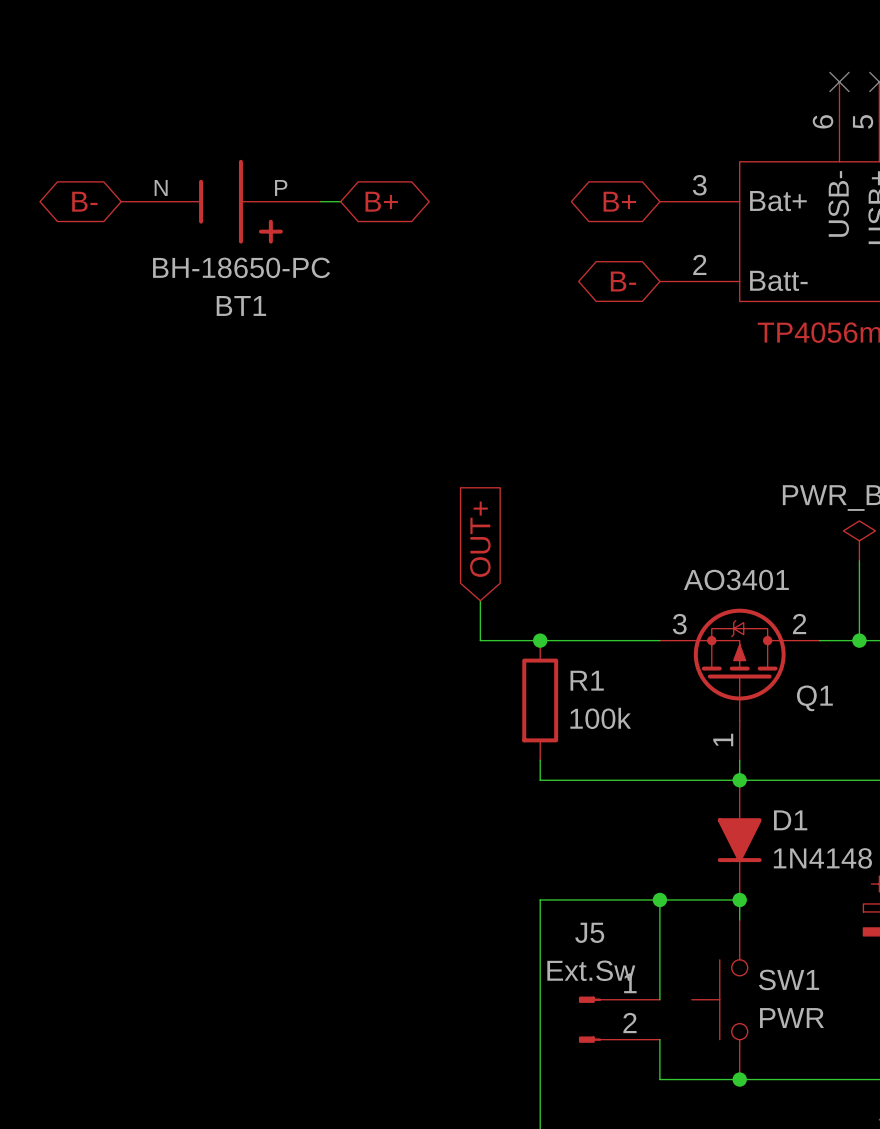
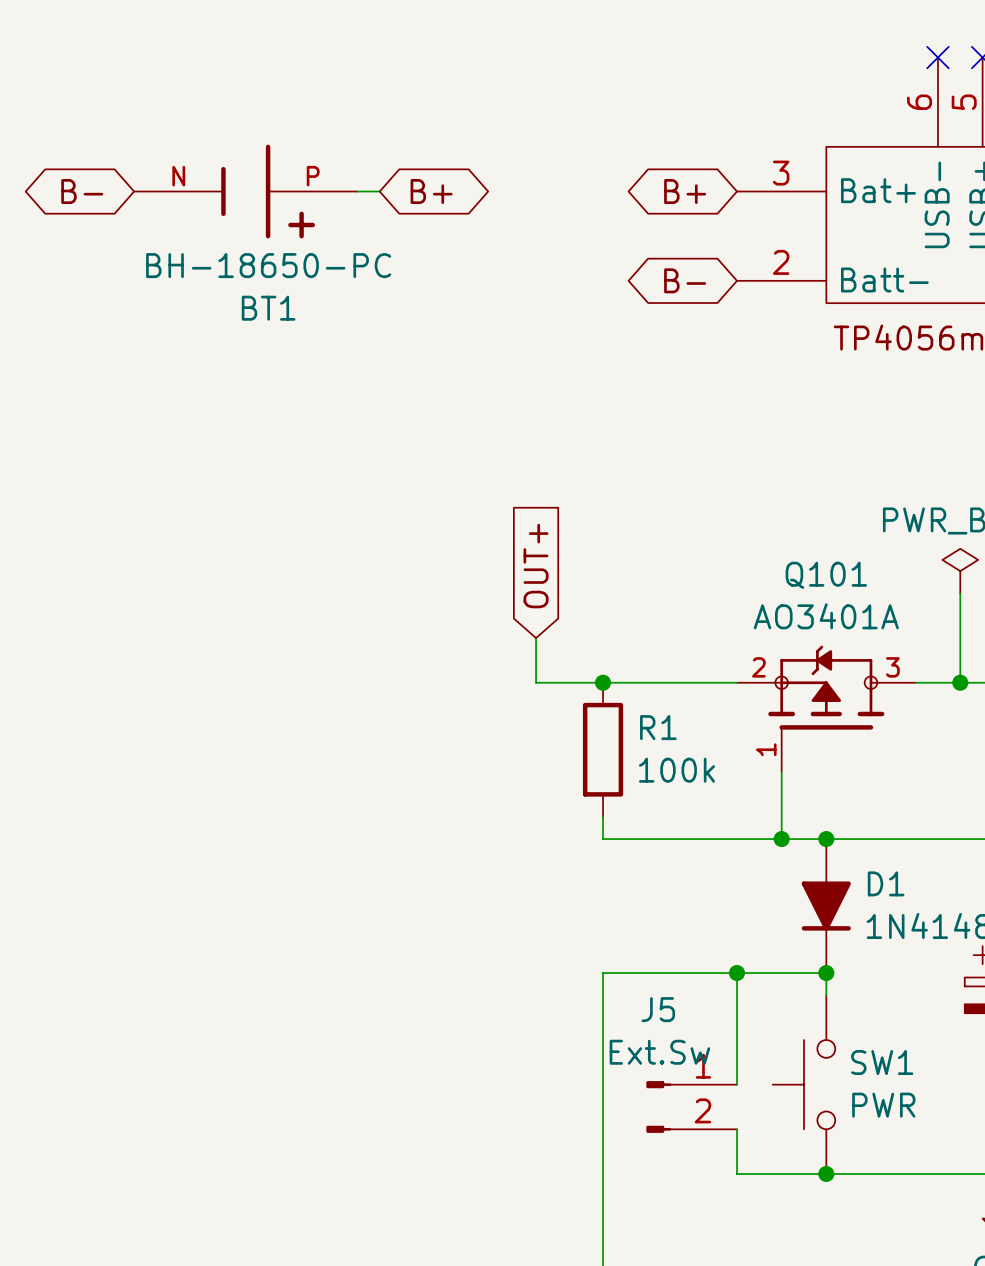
Q101: none -> AO3401A (826, 708)
Q1: AO3401 (739, 684) -> none
wire: none -> (781, 772) (781, 839)
wire: (739, 760) (739, 780) -> none
junction: none -> (781, 839)

